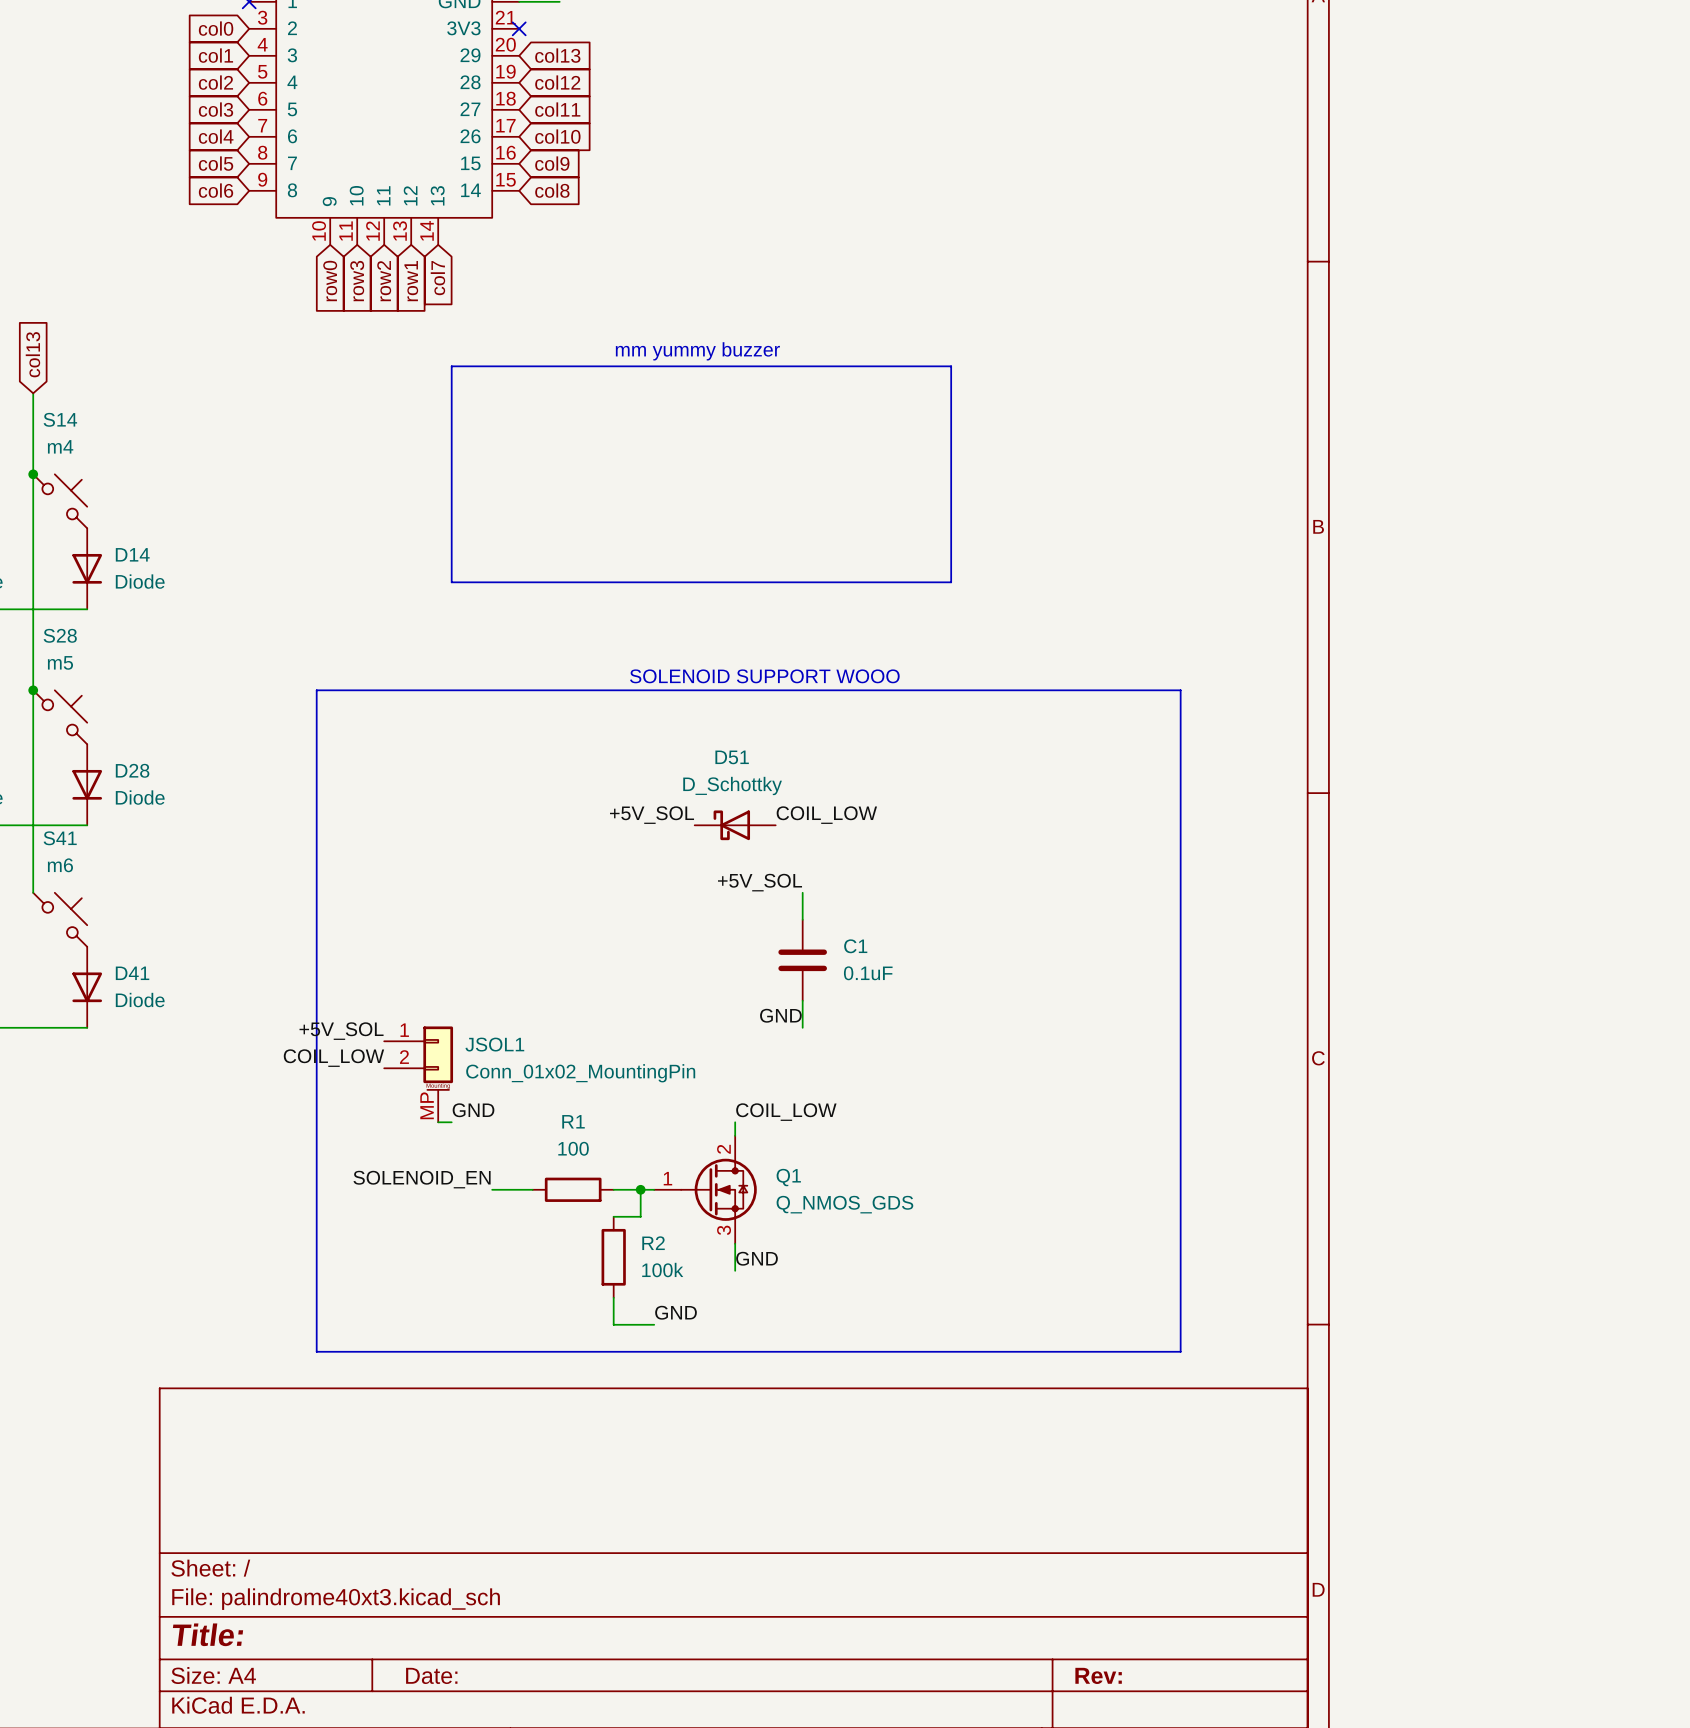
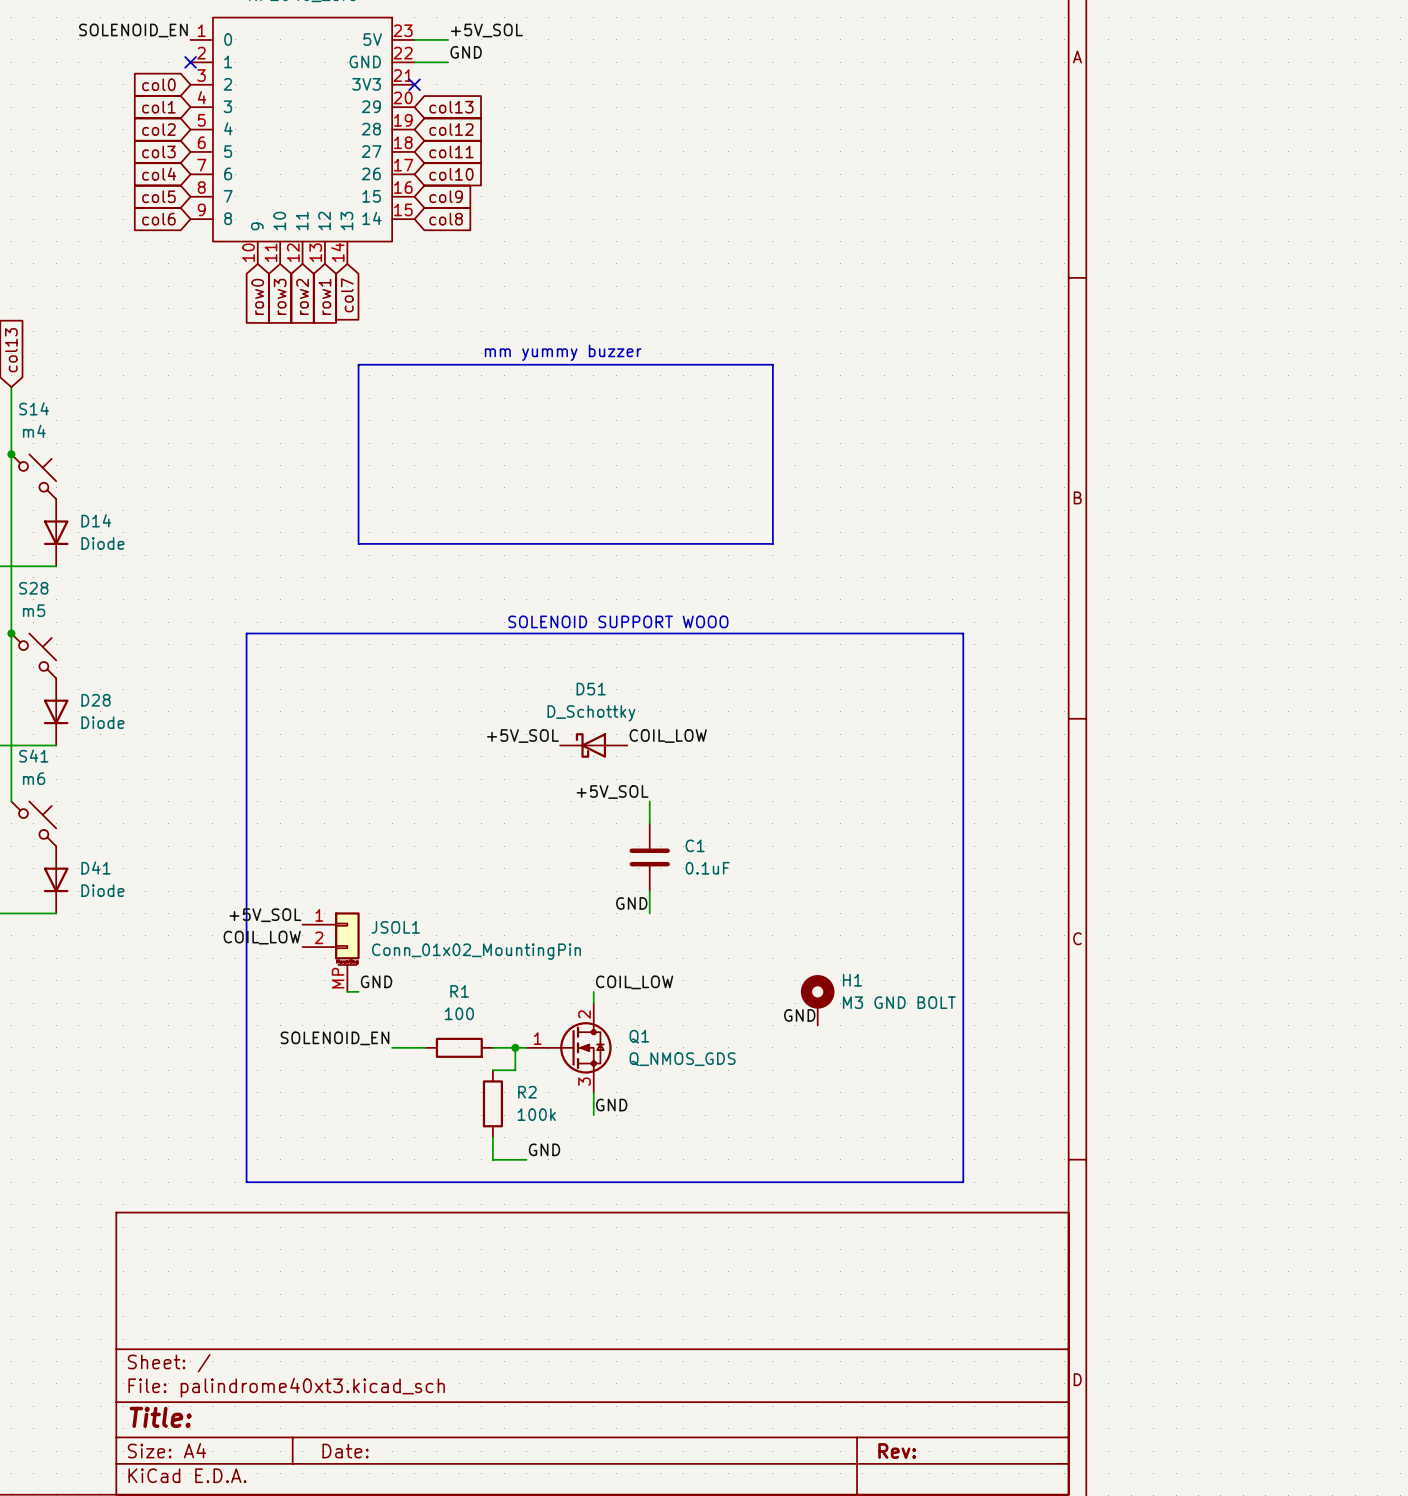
H1: none -> M3 GND BOLT (817, 1000)
label: none -> GND (799, 1015)

